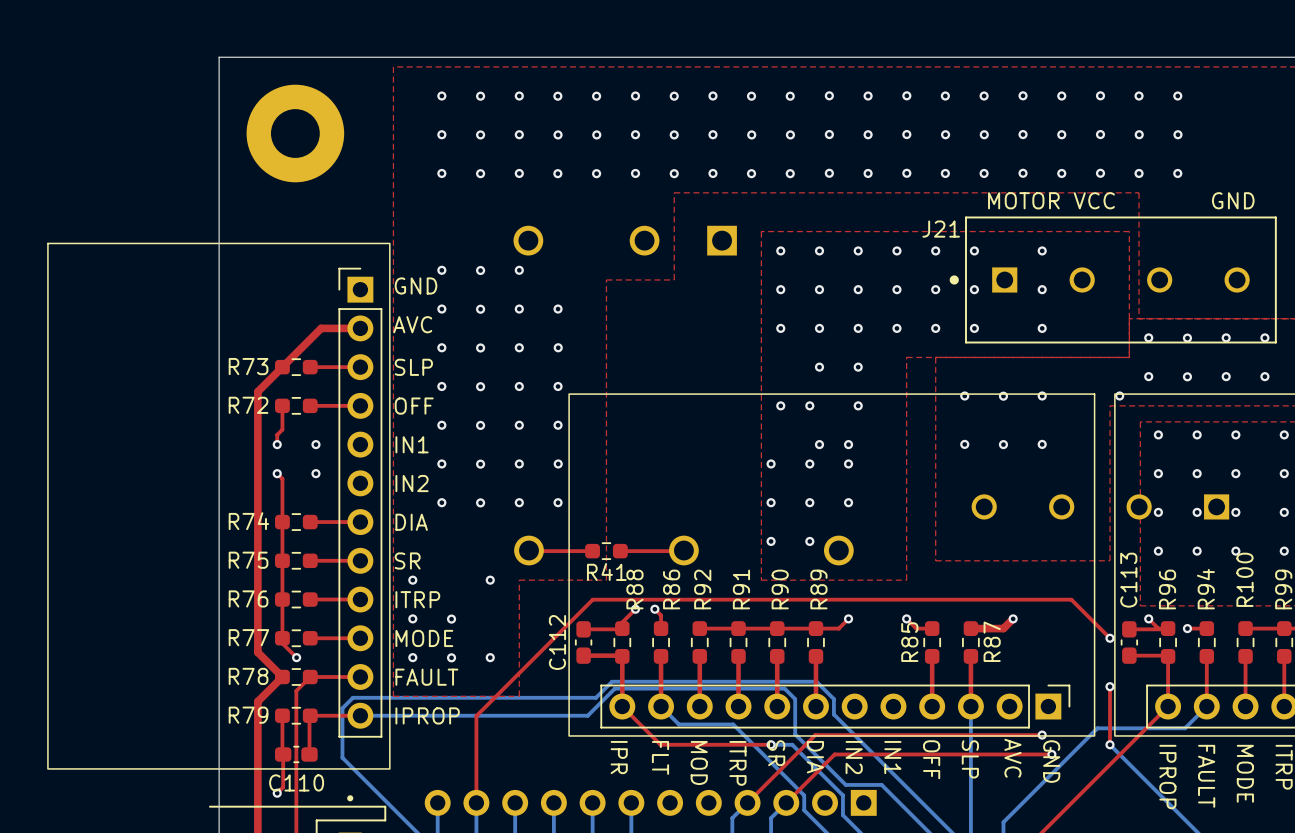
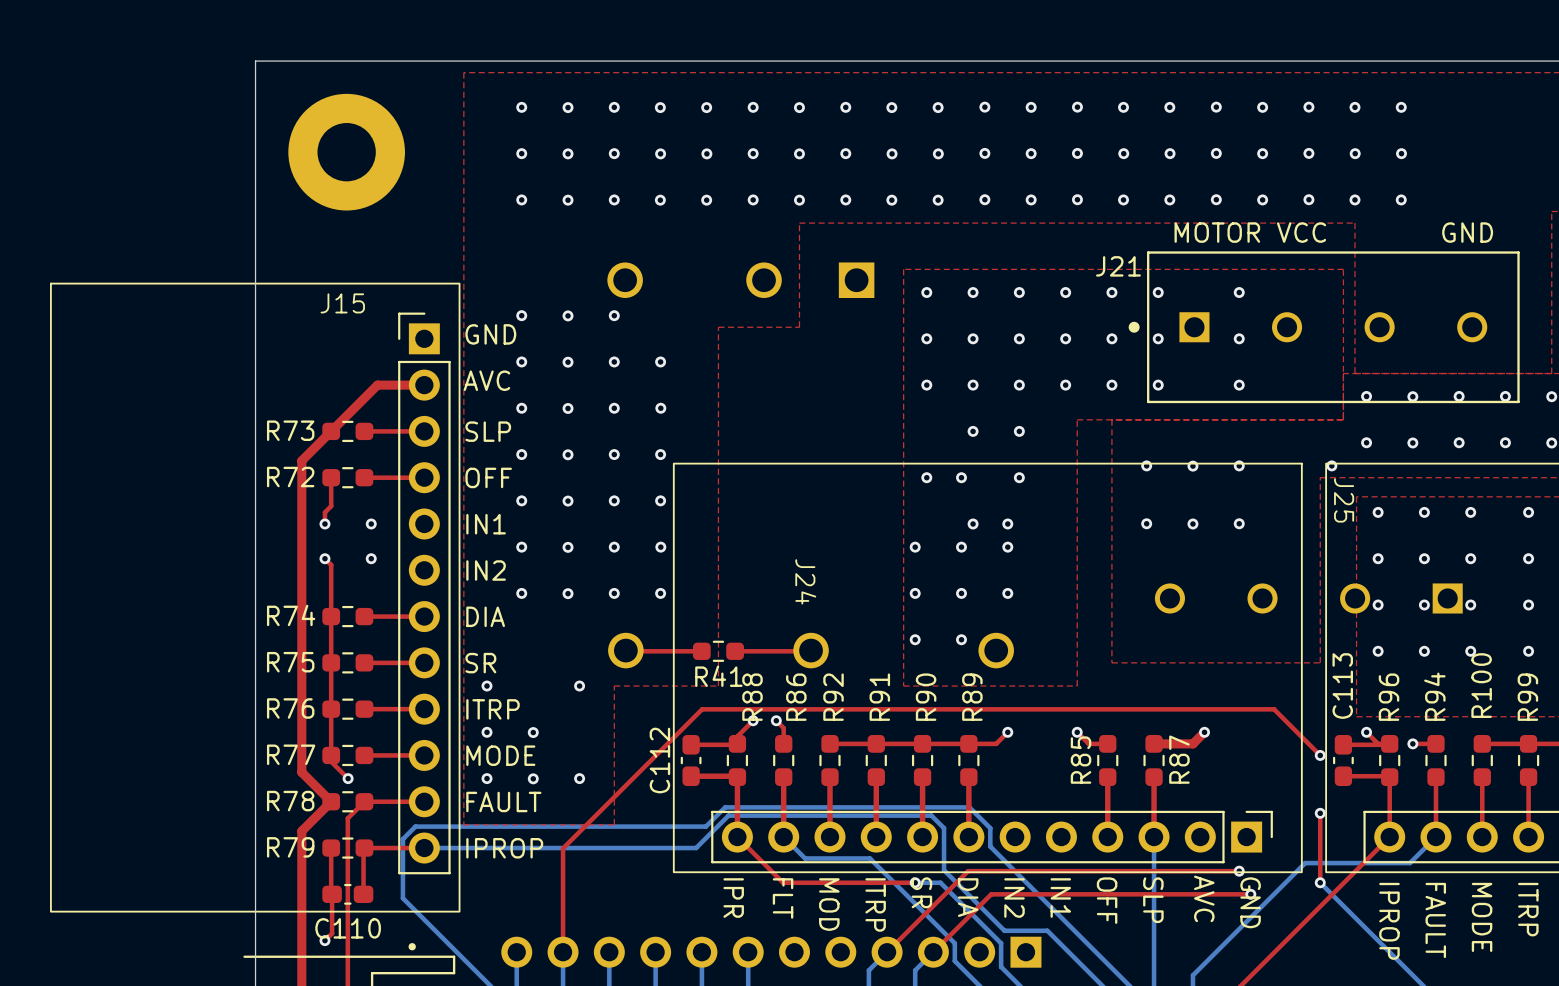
J15 name: none -> J15 (342, 303)
J25 name: none -> J25 (1344, 500)
J24 name: none -> J24 (805, 581)

